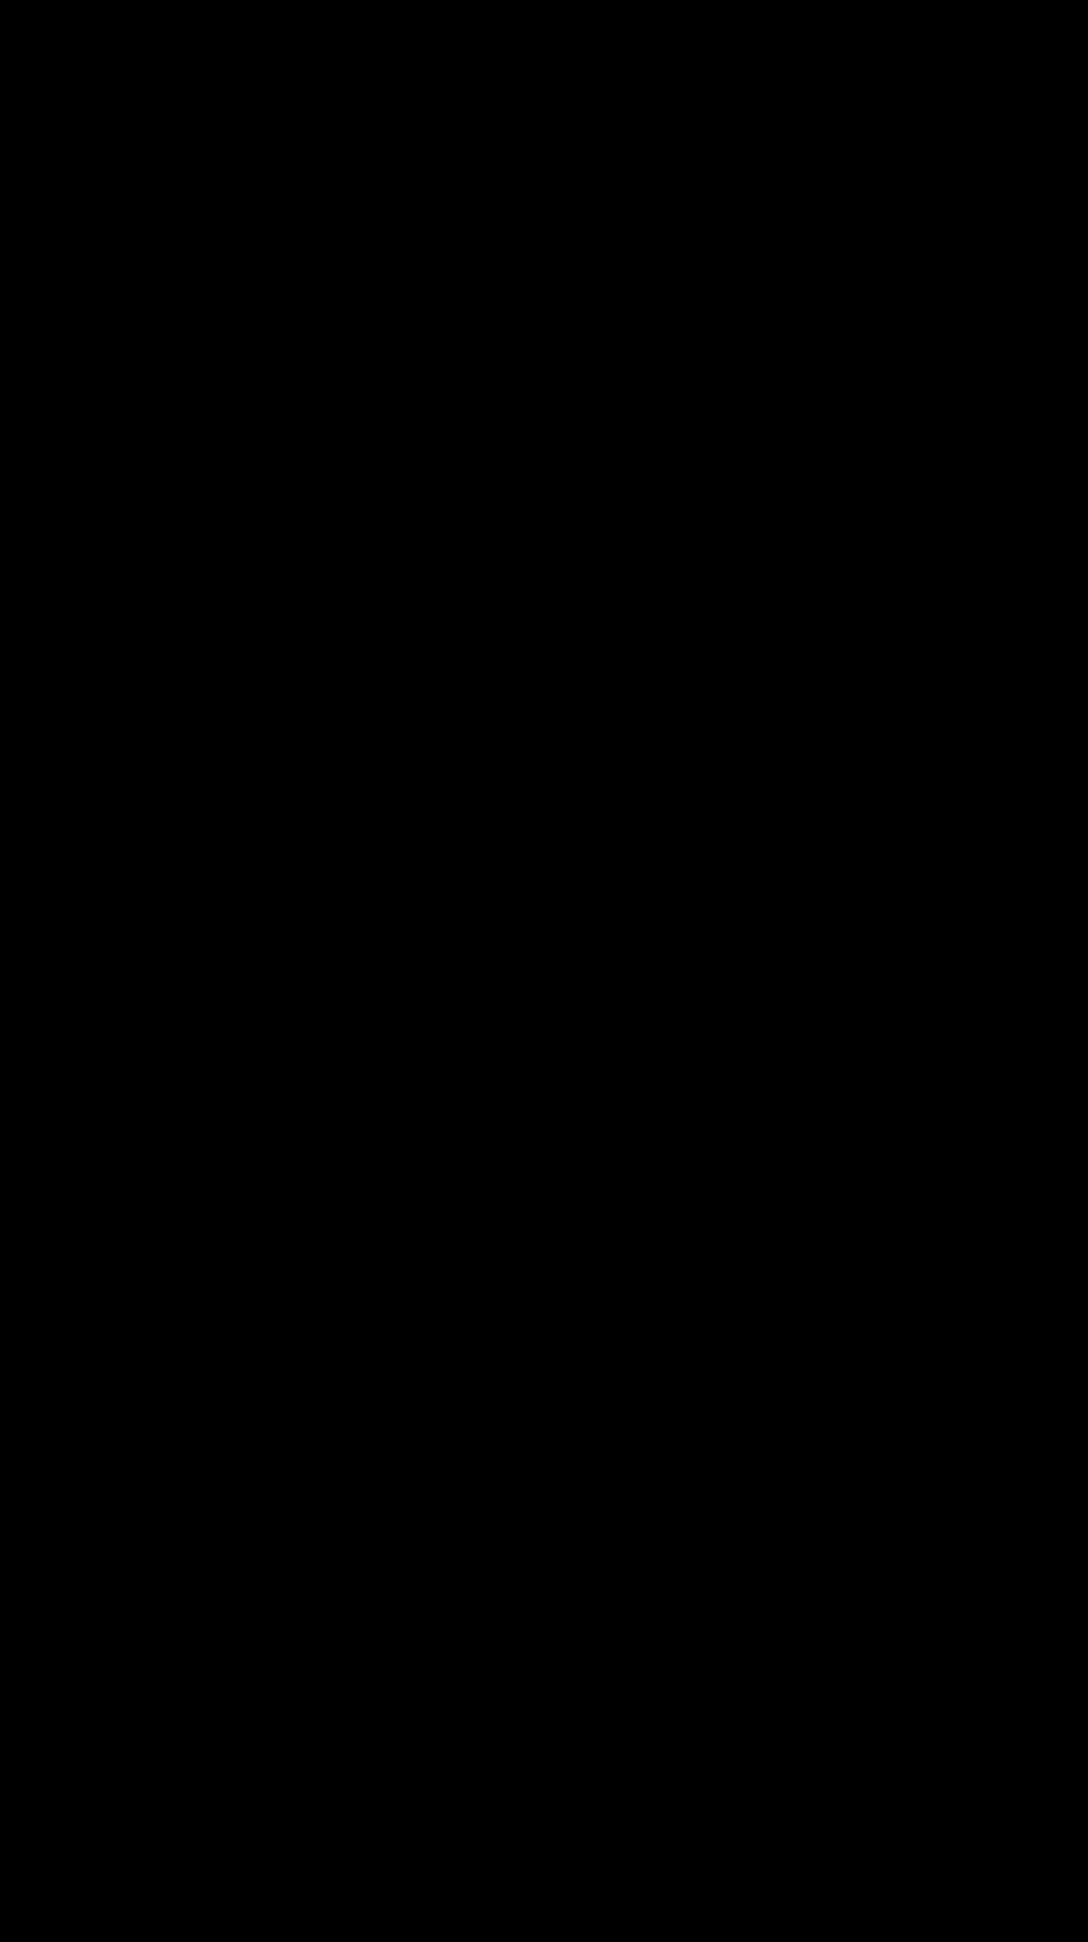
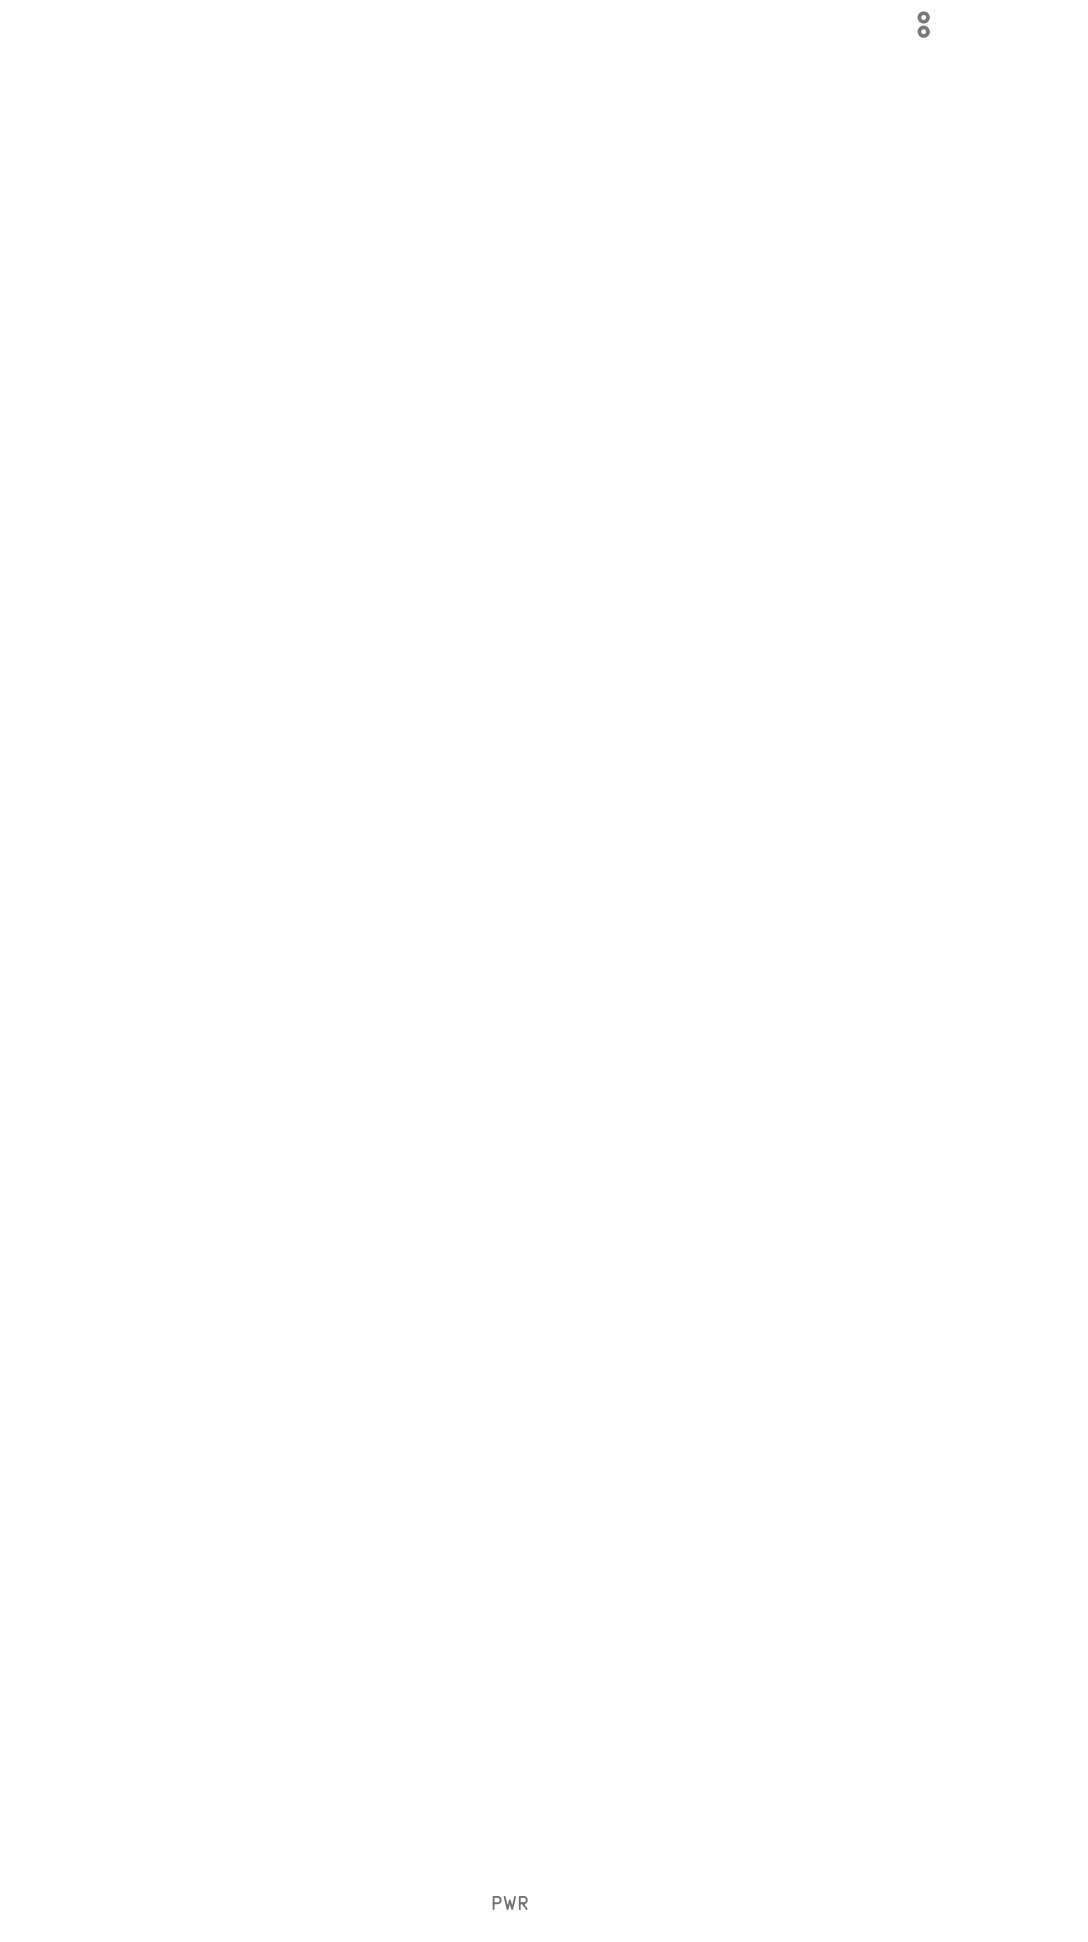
via: none -> (923, 17)
via: none -> (923, 31)
text: none -> PWR (510, 1902)

